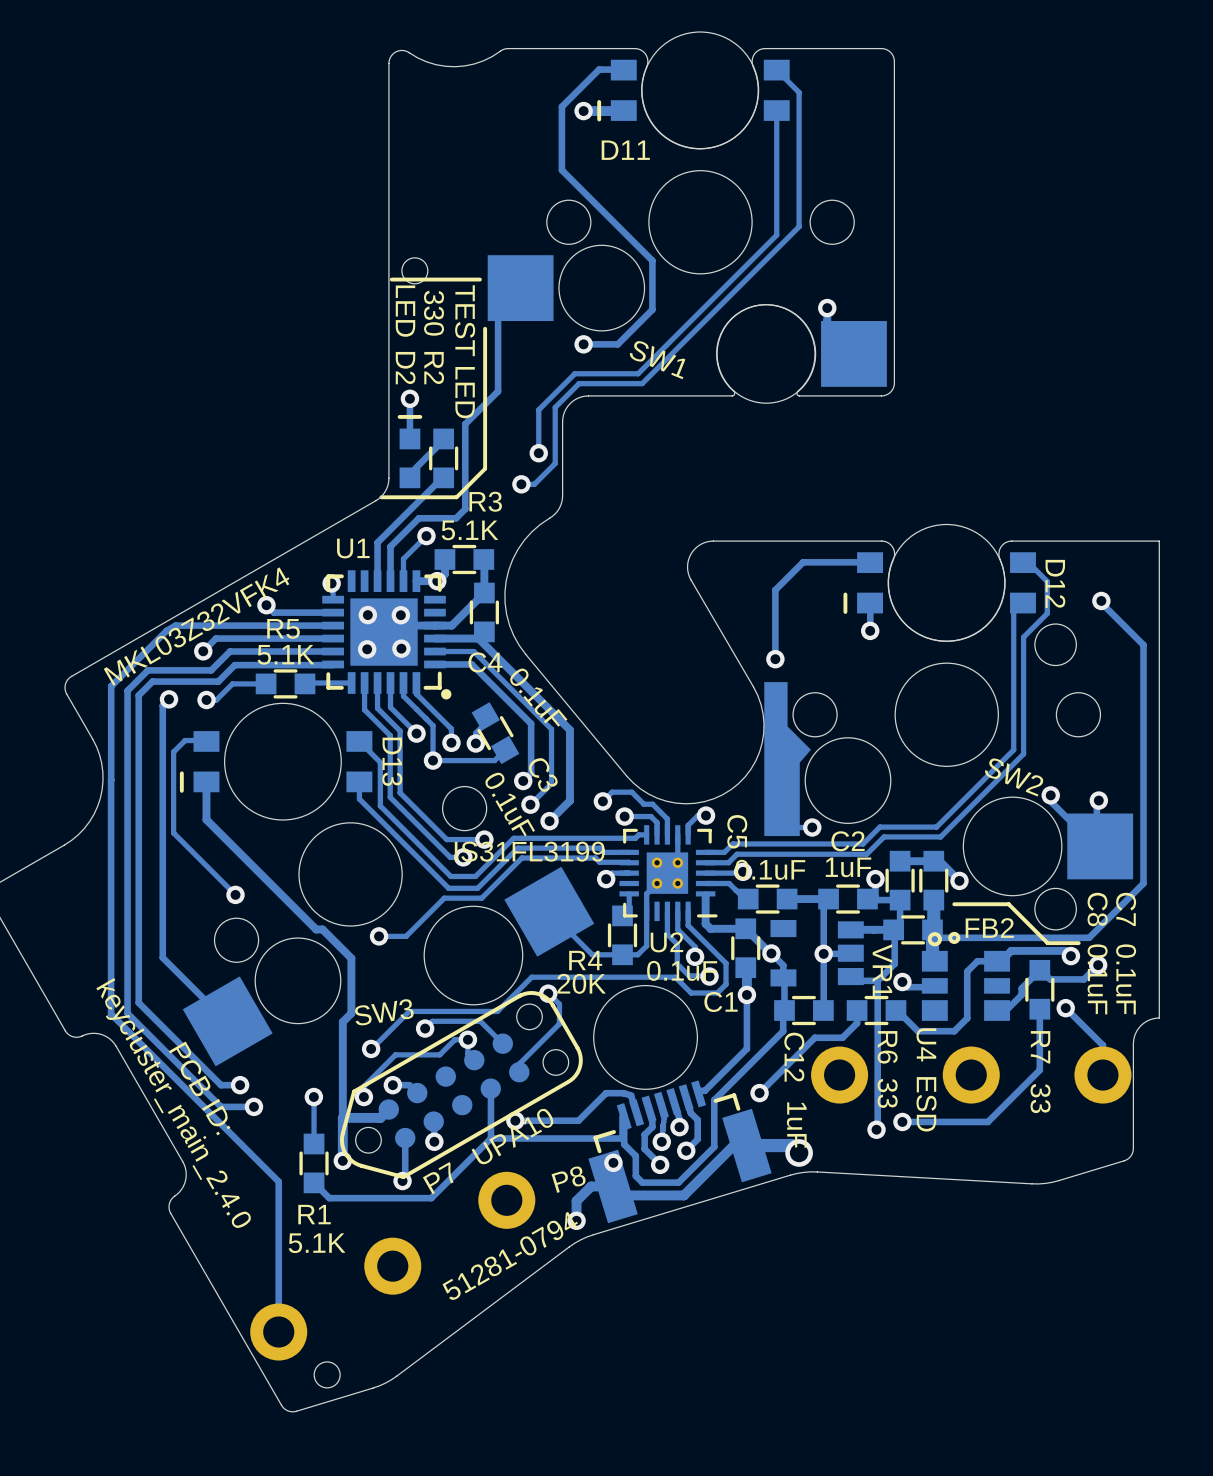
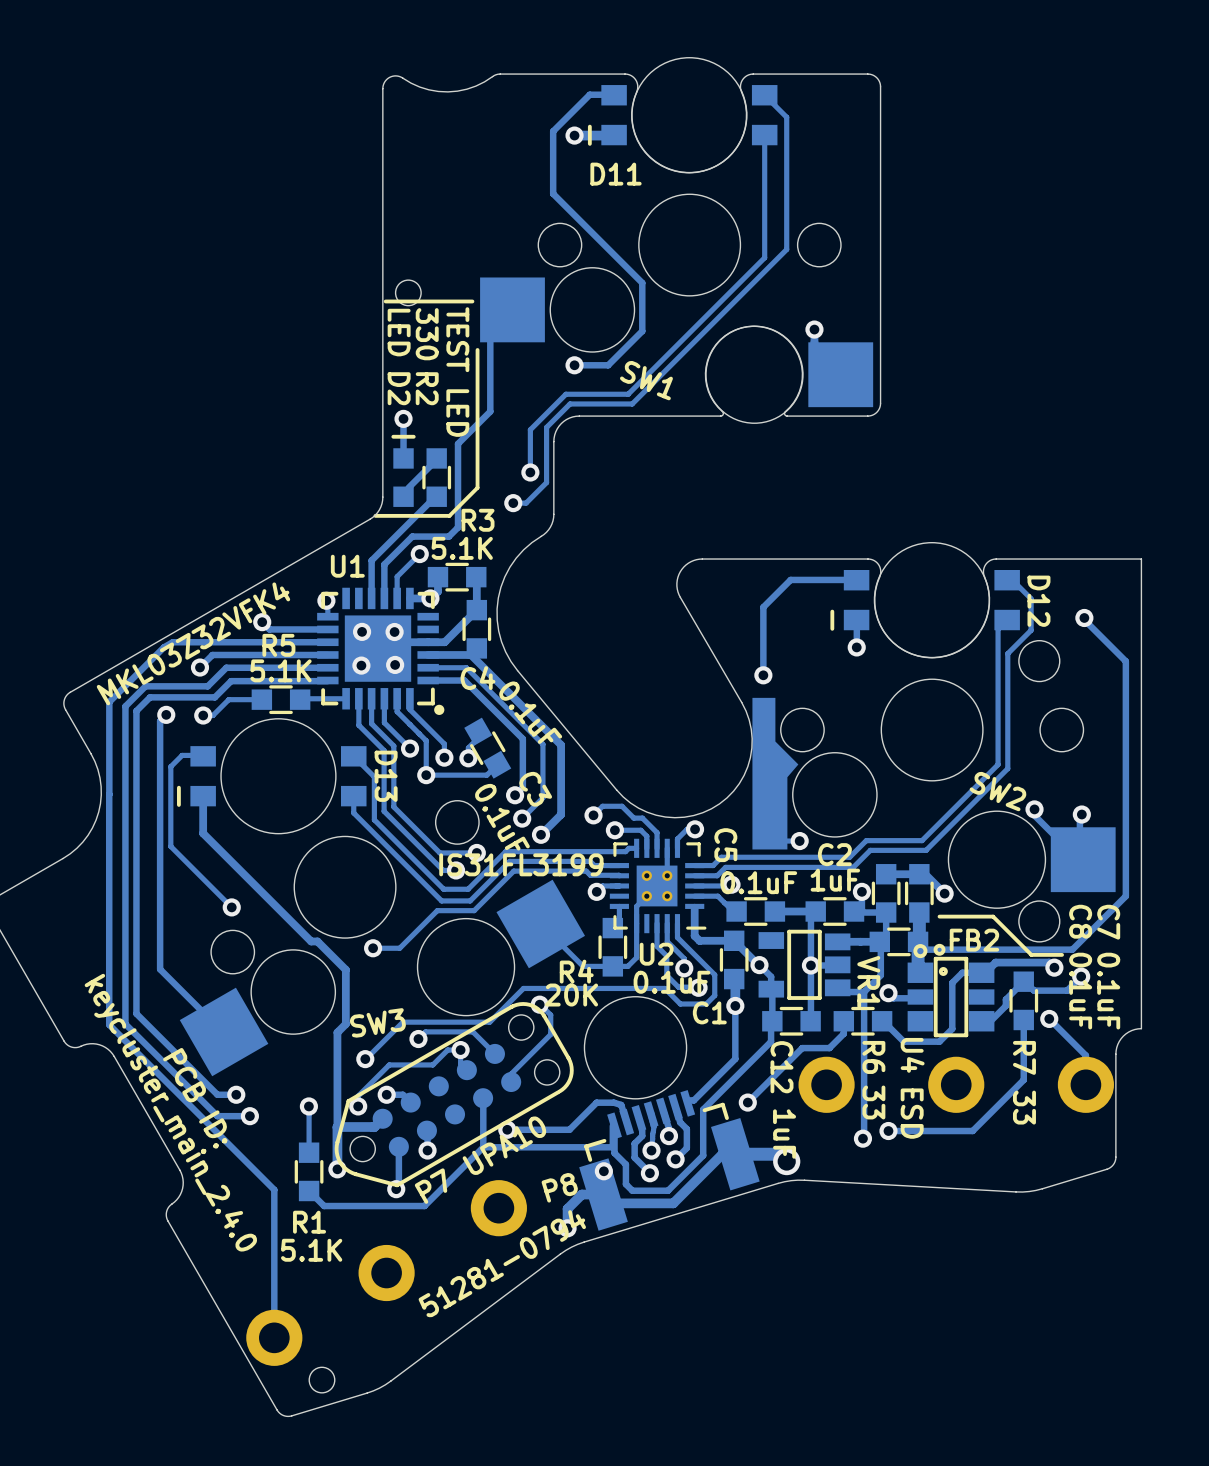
VR1 footprint: [770, 919, 864, 987] -> [758, 929, 851, 1000]
U4 footprint: [921, 932, 1011, 1021] -> [907, 944, 995, 1038]

